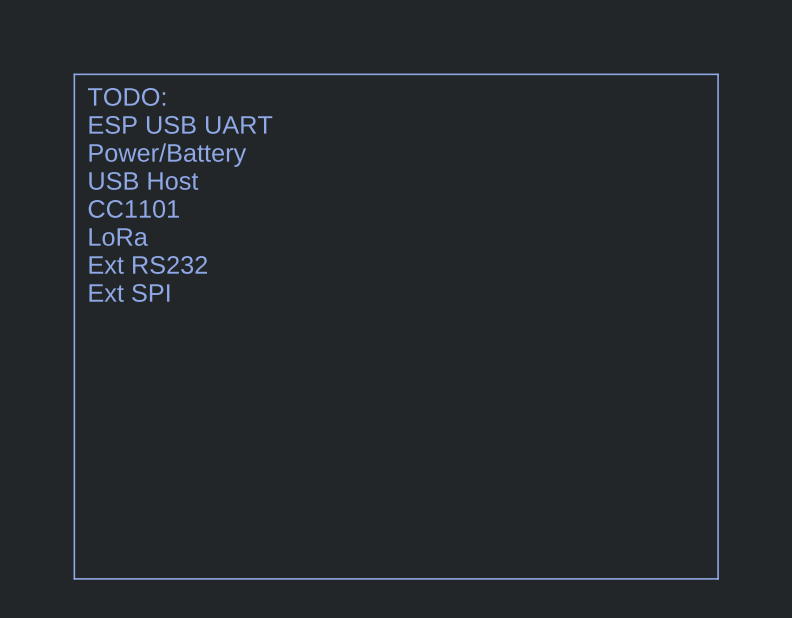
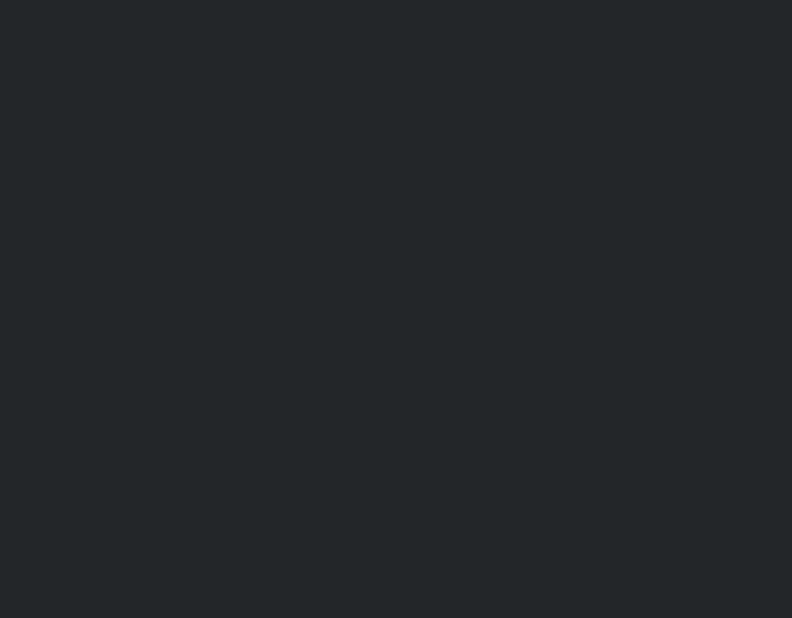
line: (74, 74) (718, 74) (718, 578) (74, 578) (74, 74) -> none
text: TODO: (126, 96) -> none
text: ESP USB UART (180, 124) -> none
text: Power/Battery (167, 155) -> none
text: USB Host (143, 180) -> none
text: CC1101 (133, 208) -> none
text: LoRa (118, 237) -> none
text: Ext RS232 (148, 264) -> none
text: Ext SPI (129, 292) -> none

